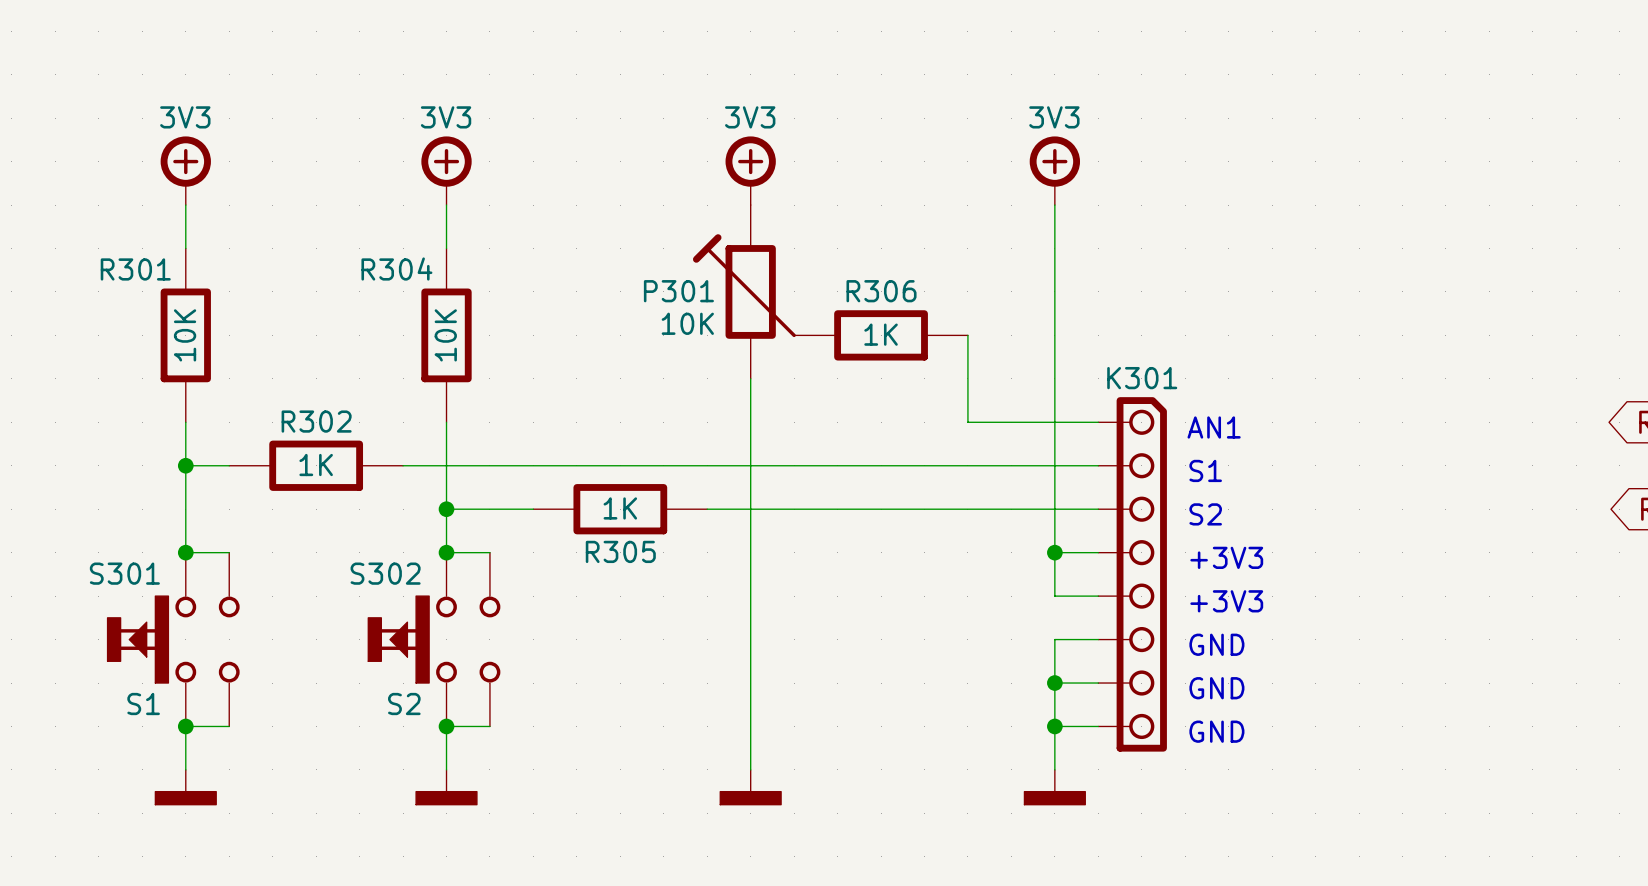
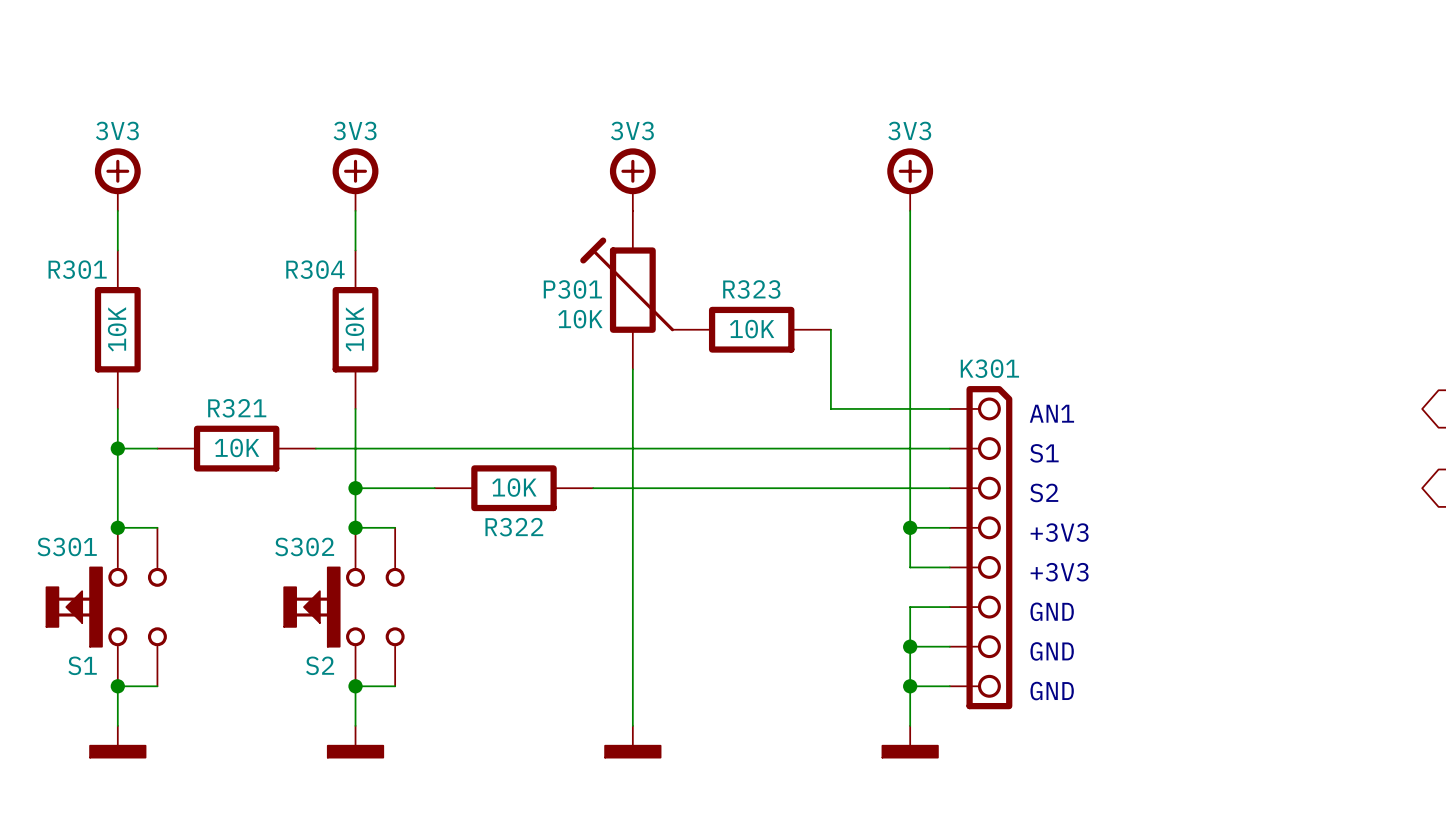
R306 name: R306 (881, 291) -> R323 (751, 289)
R306 value: 1K (881, 334) -> 10K (752, 329)
R302 name: R302 (316, 421) -> R321 (237, 408)
R302 value: 1K (316, 465) -> 10K (237, 447)
R305 value: 1K (620, 508) -> 10K (514, 487)
R305 name: R305 (620, 551) -> R322 (514, 527)

